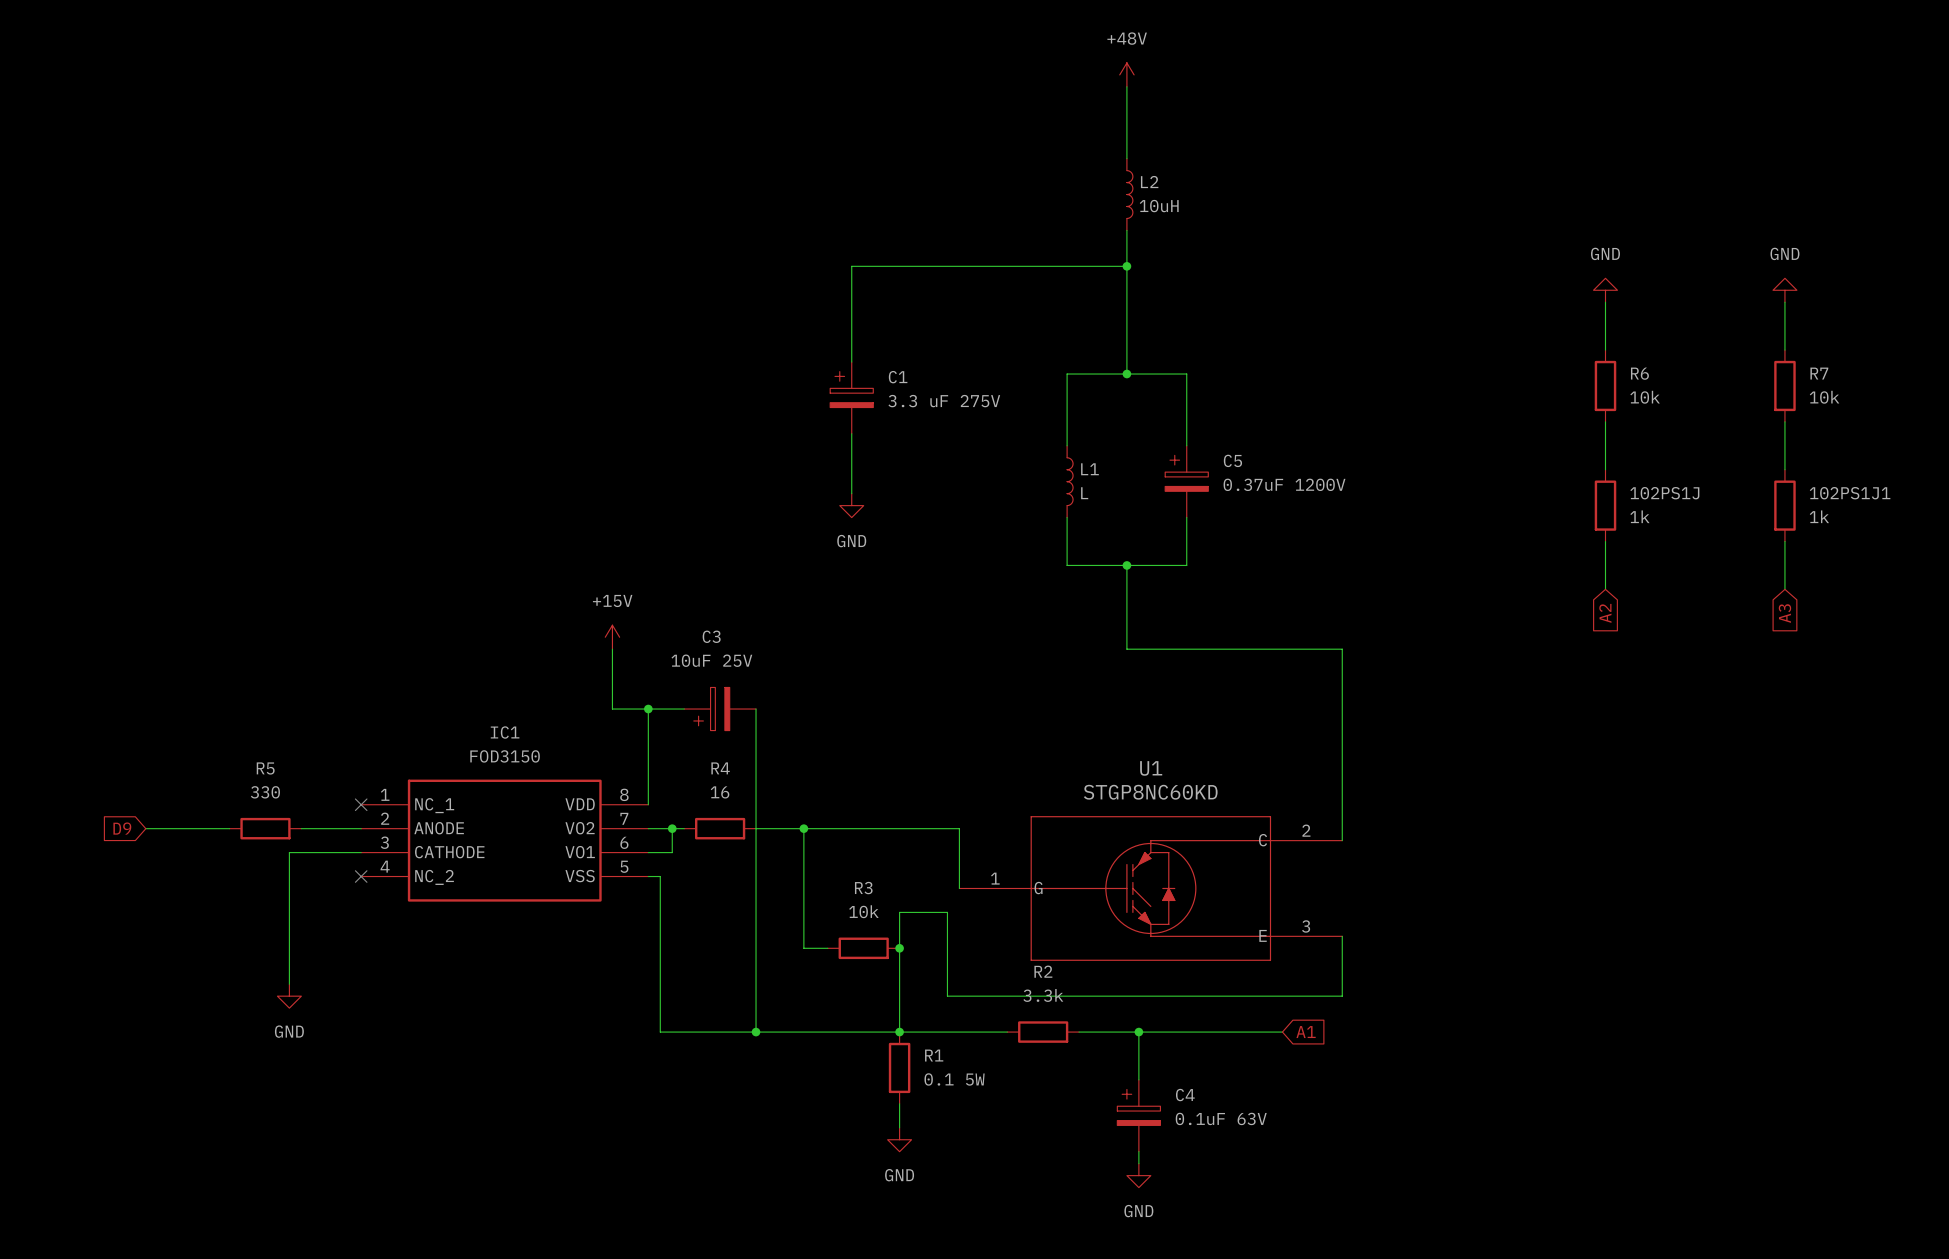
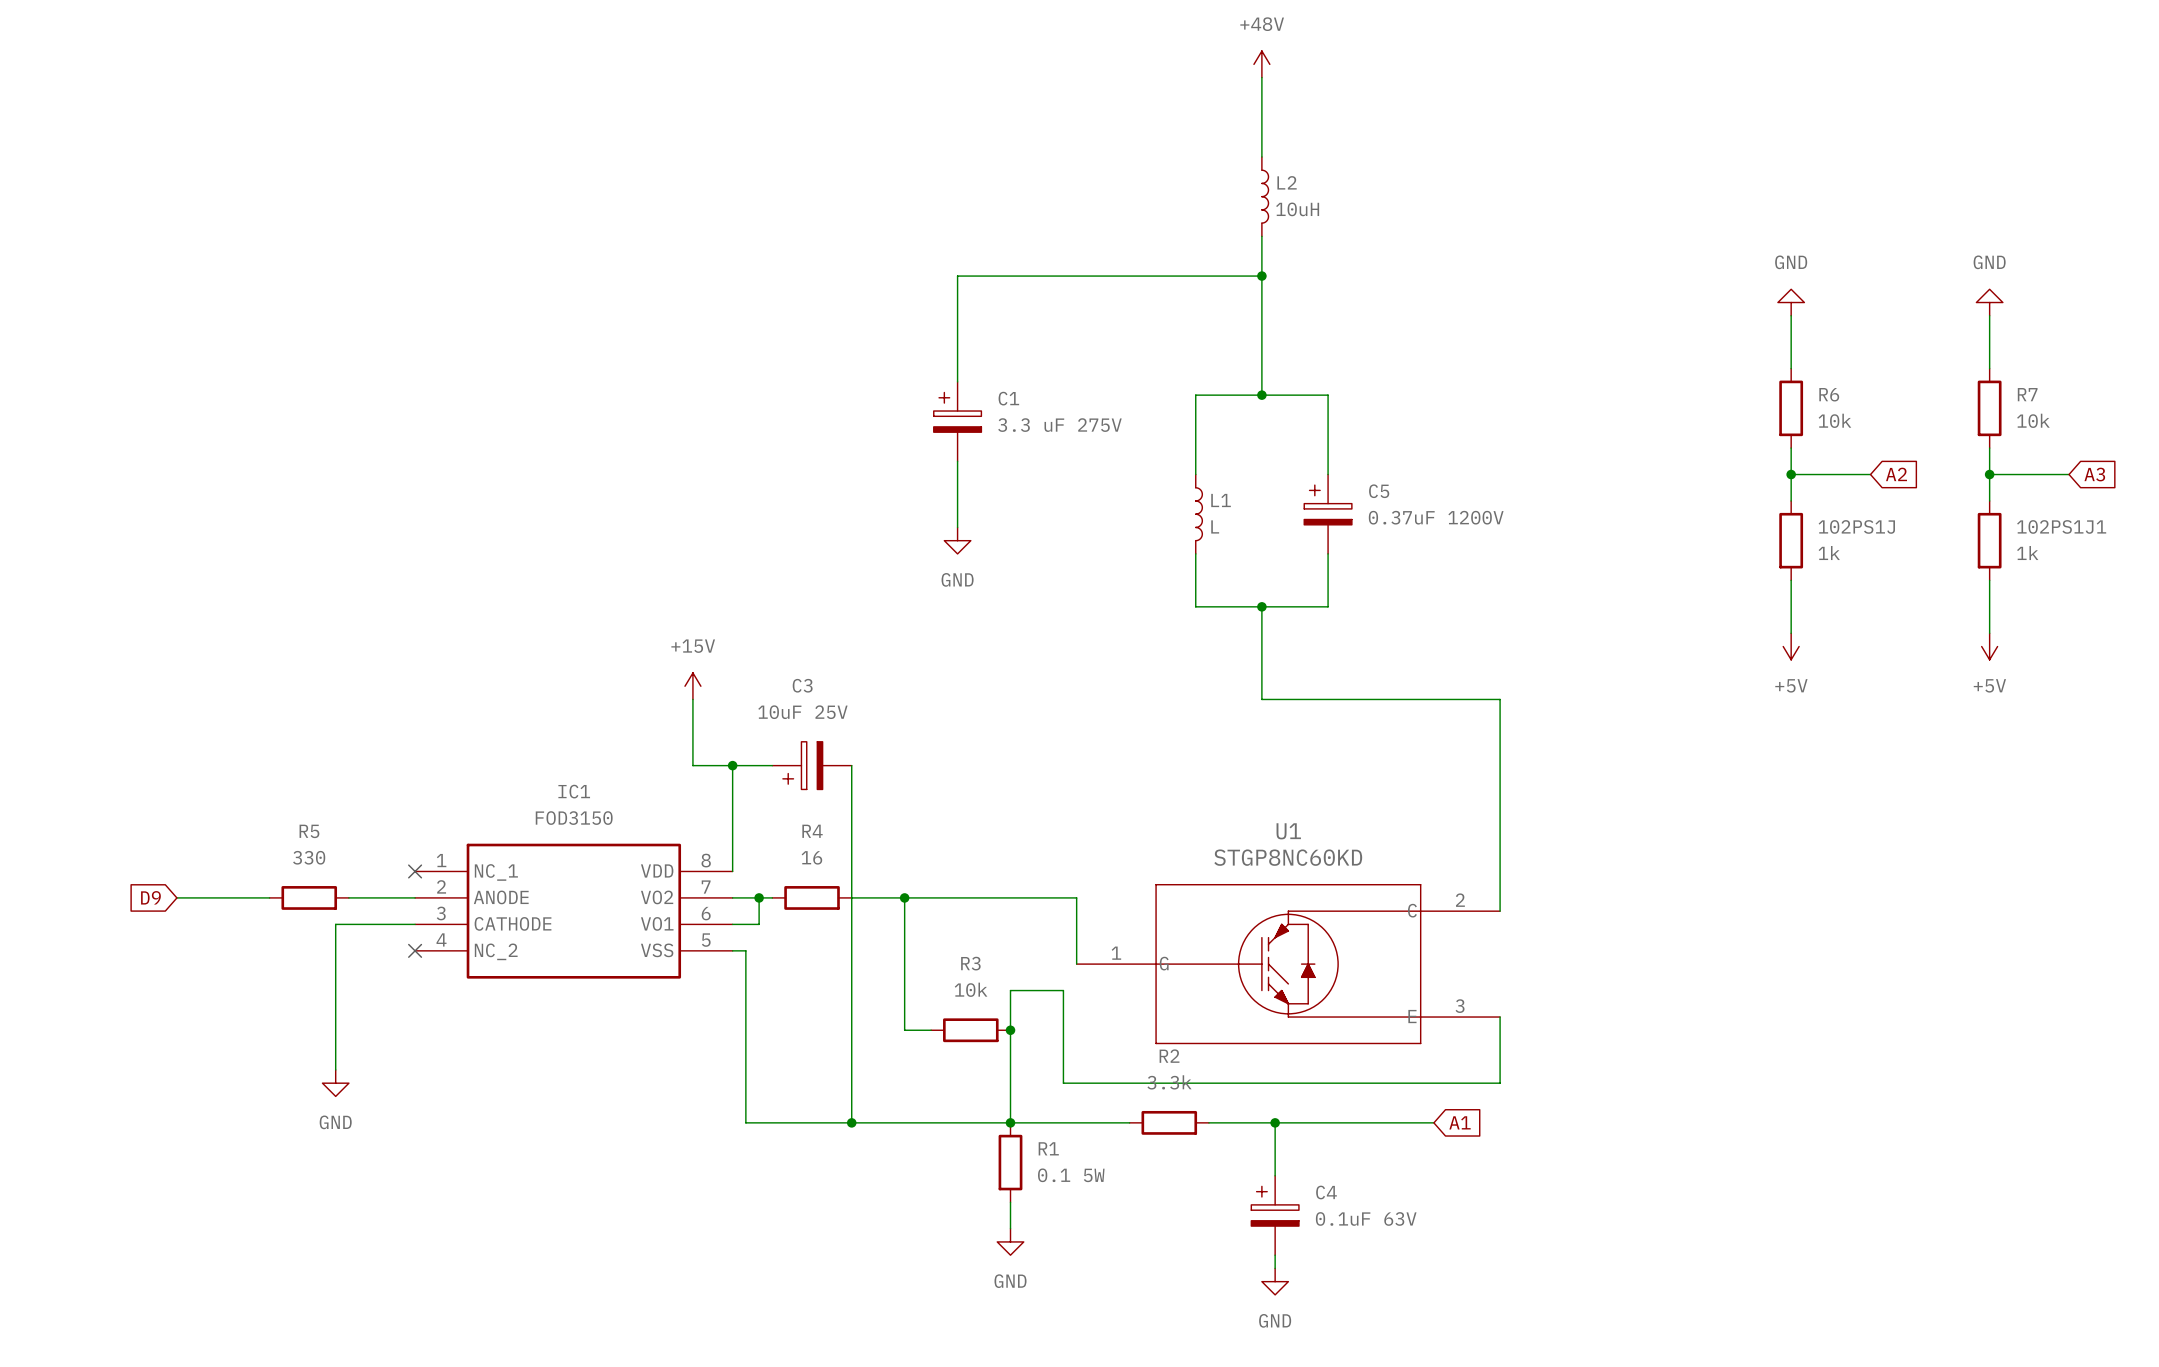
wire: none -> (1791, 474) (1870, 474)
junction: none -> (1791, 474)
wire: none -> (1989, 474) (2069, 474)
junction: none -> (1989, 474)
power symbol: none -> +5V (1791, 646)
power symbol: none -> +5V (1989, 646)
global label rotation: 0° (1605, 613) -> 90° counterclockwise (1896, 474)
global label position: A2 (1605, 613) -> A2 (1896, 474)
global label rotation: 0° (1784, 613) -> 90° counterclockwise (2094, 474)
global label position: A3 (1784, 613) -> A3 (2094, 474)

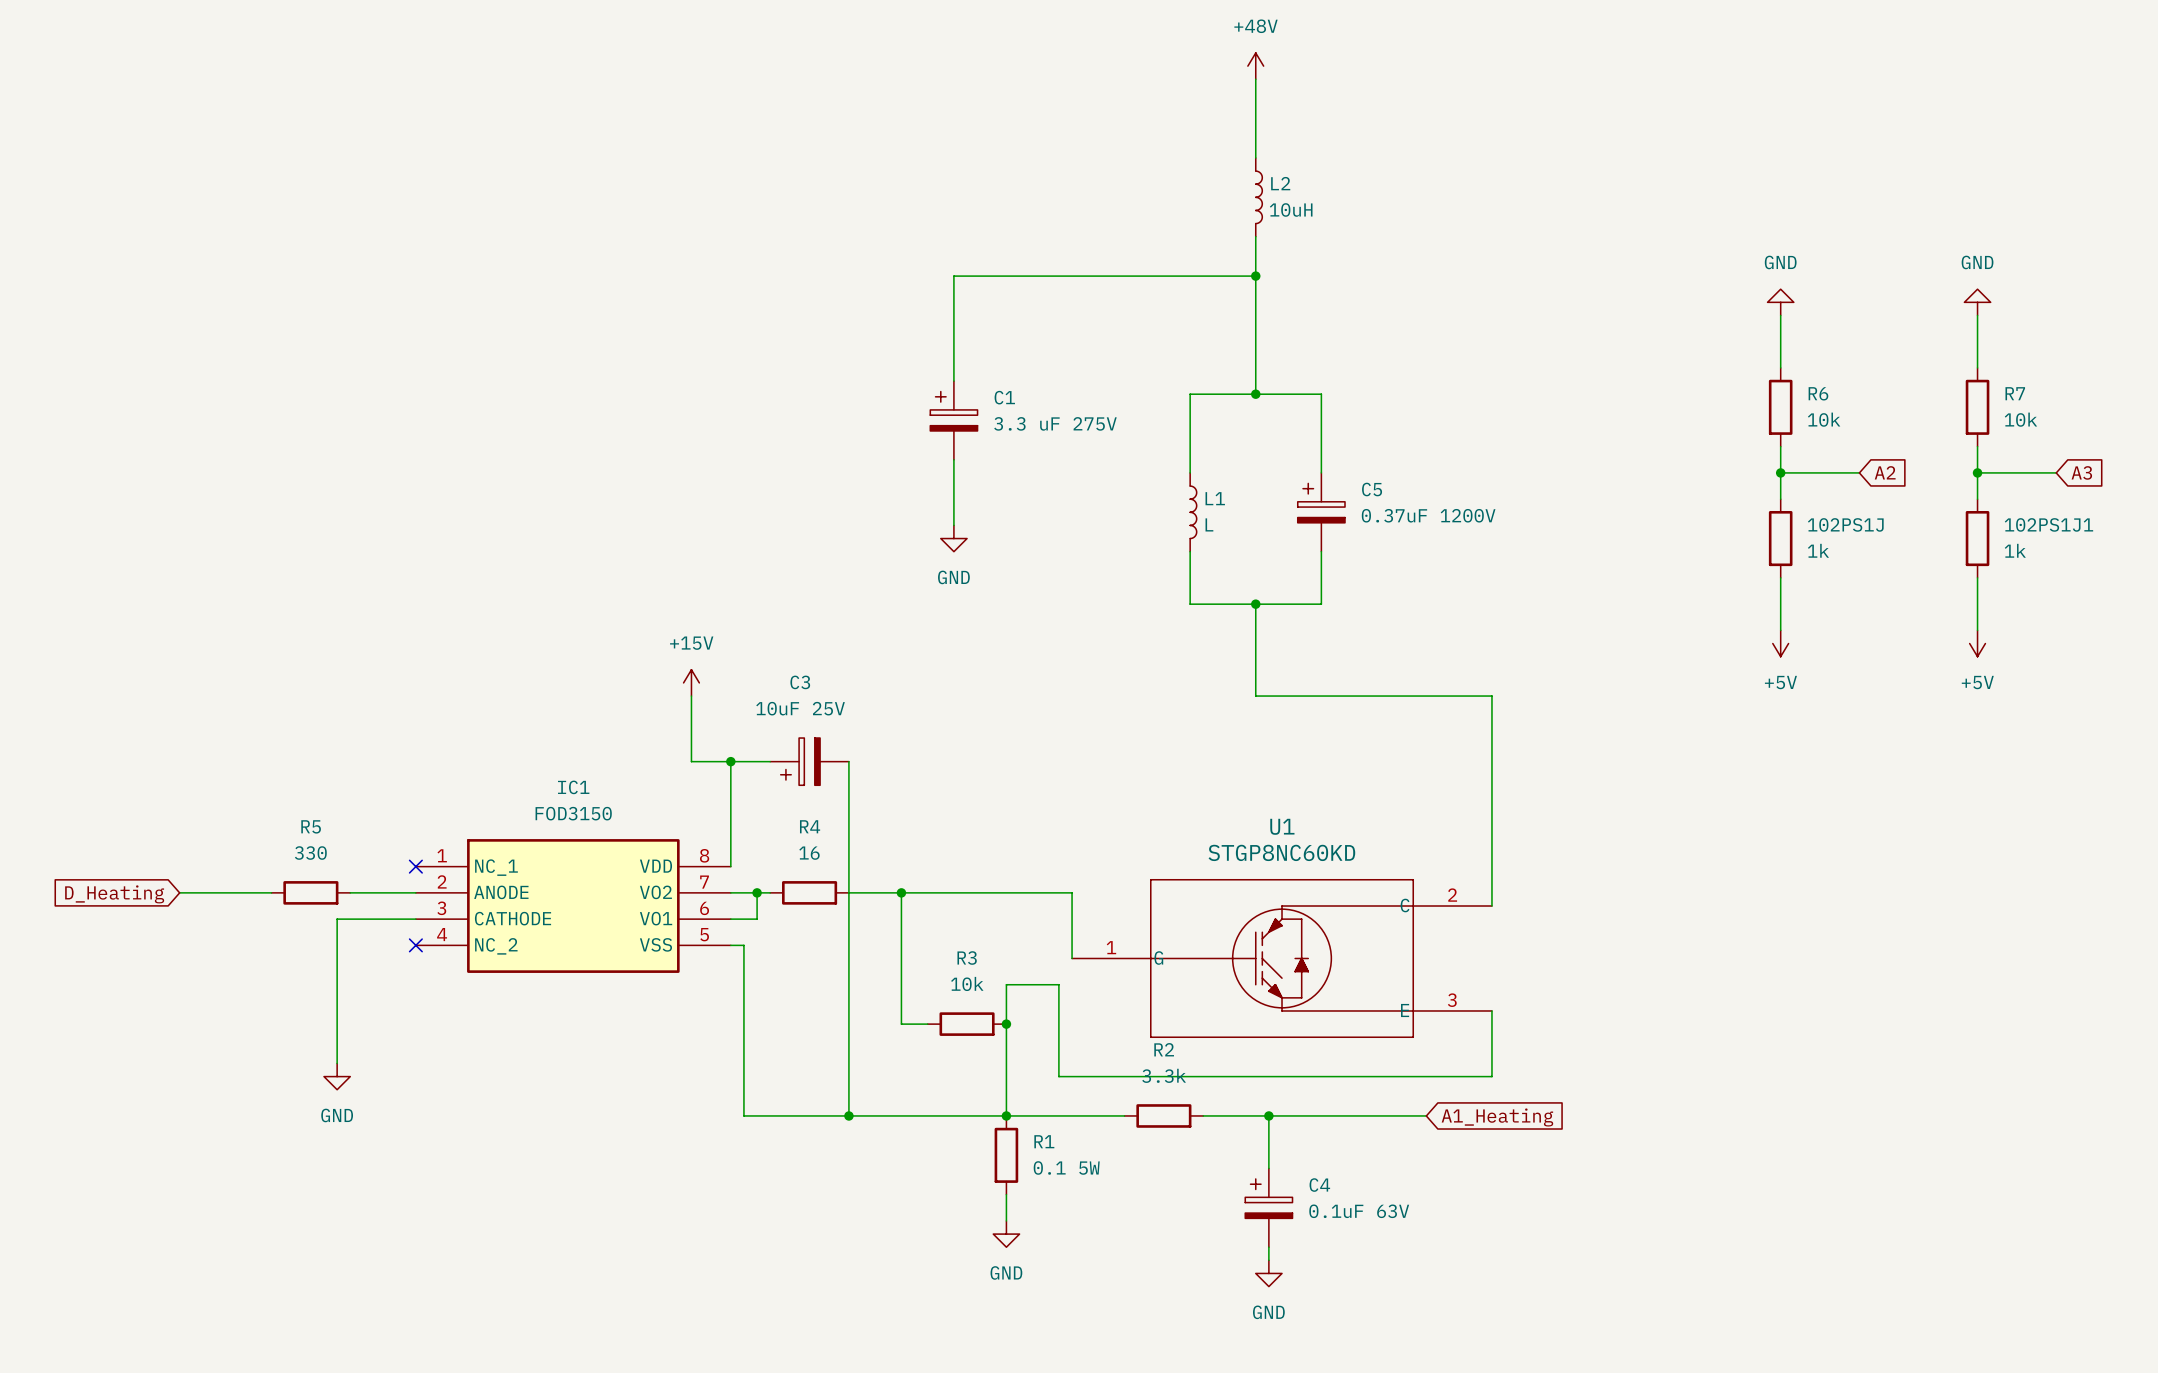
global label: D9 (150, 897) -> D_Heating (114, 894)
global label: A1 (1460, 1122) -> A1_Heating (1497, 1117)

